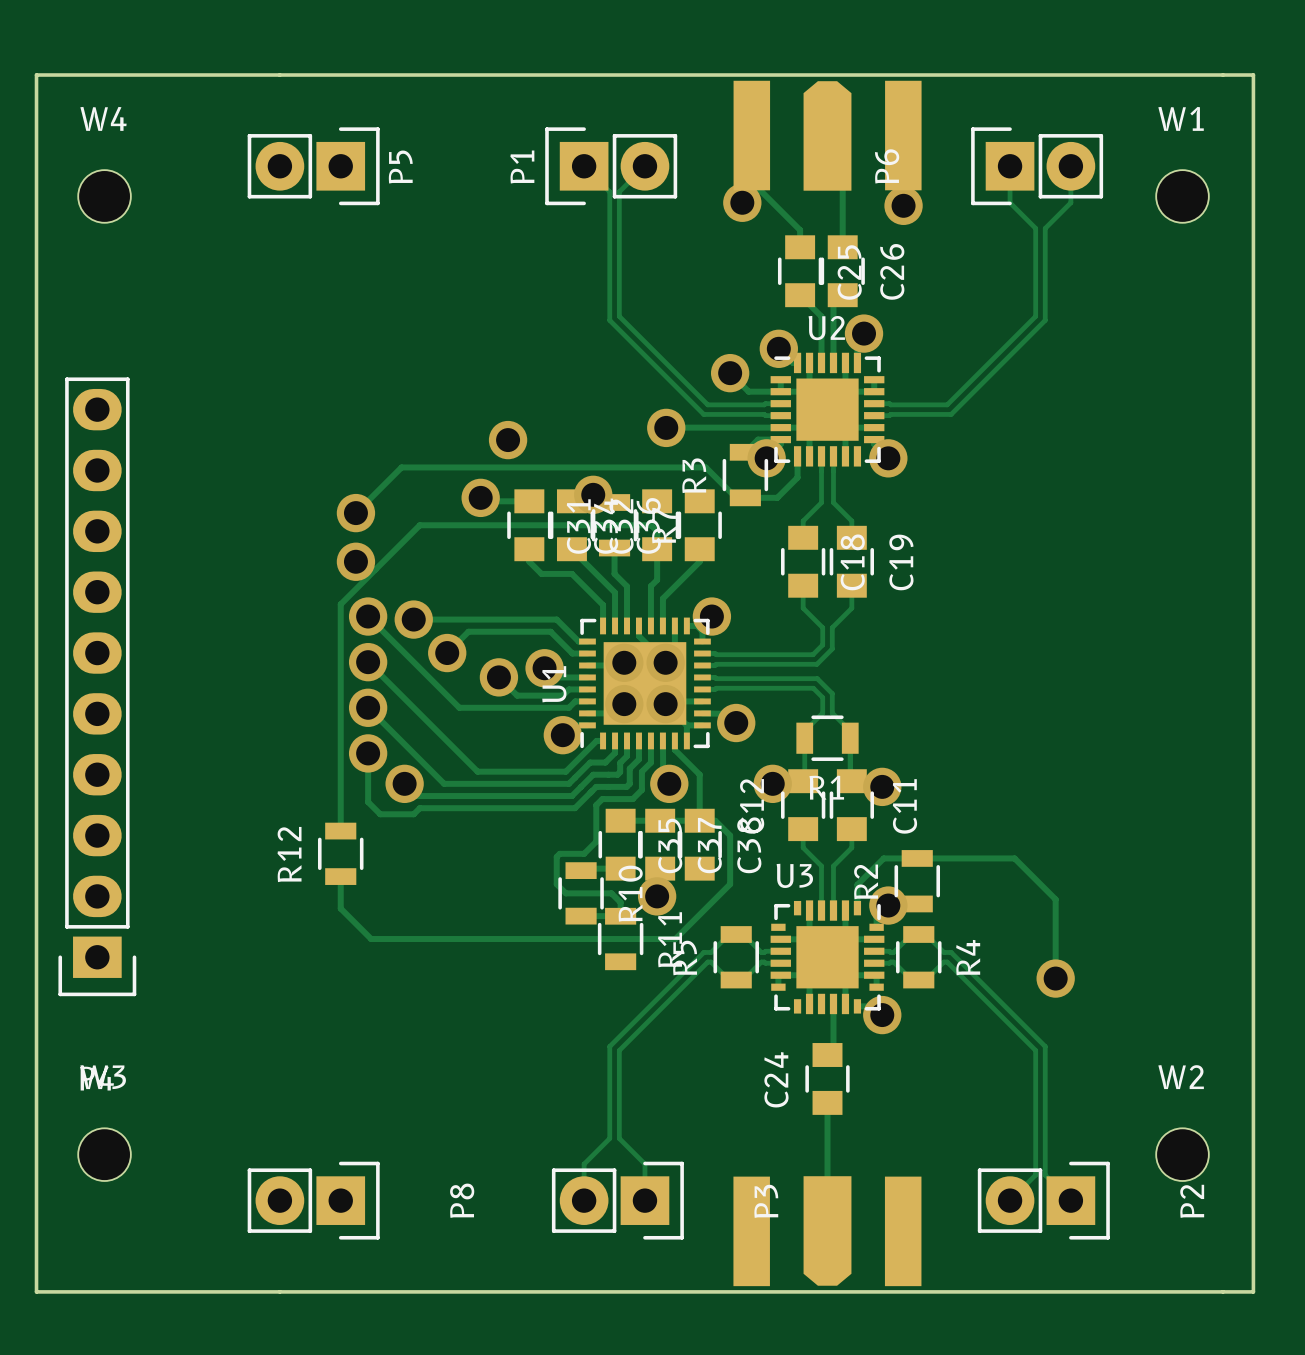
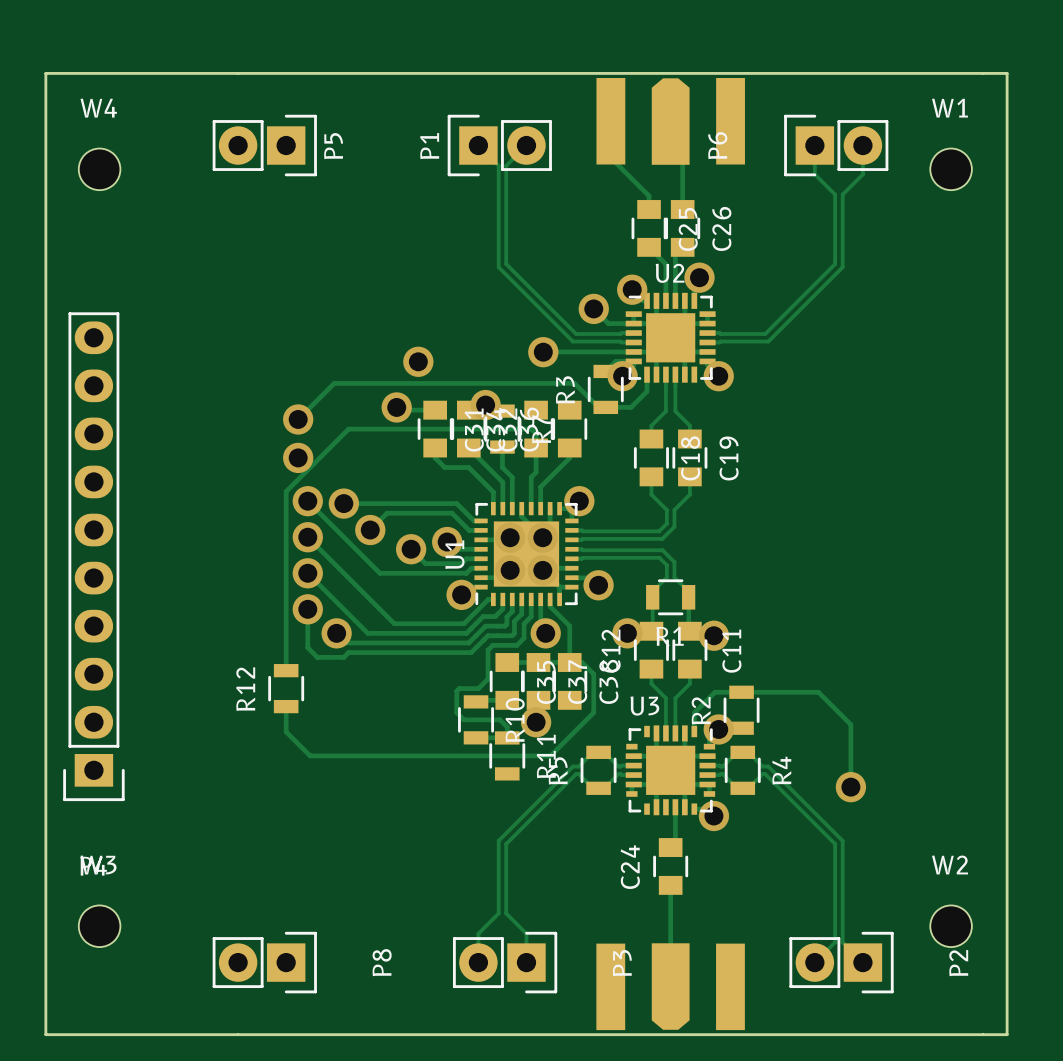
via: (742, 202) -> none
via: (903, 205) -> none

